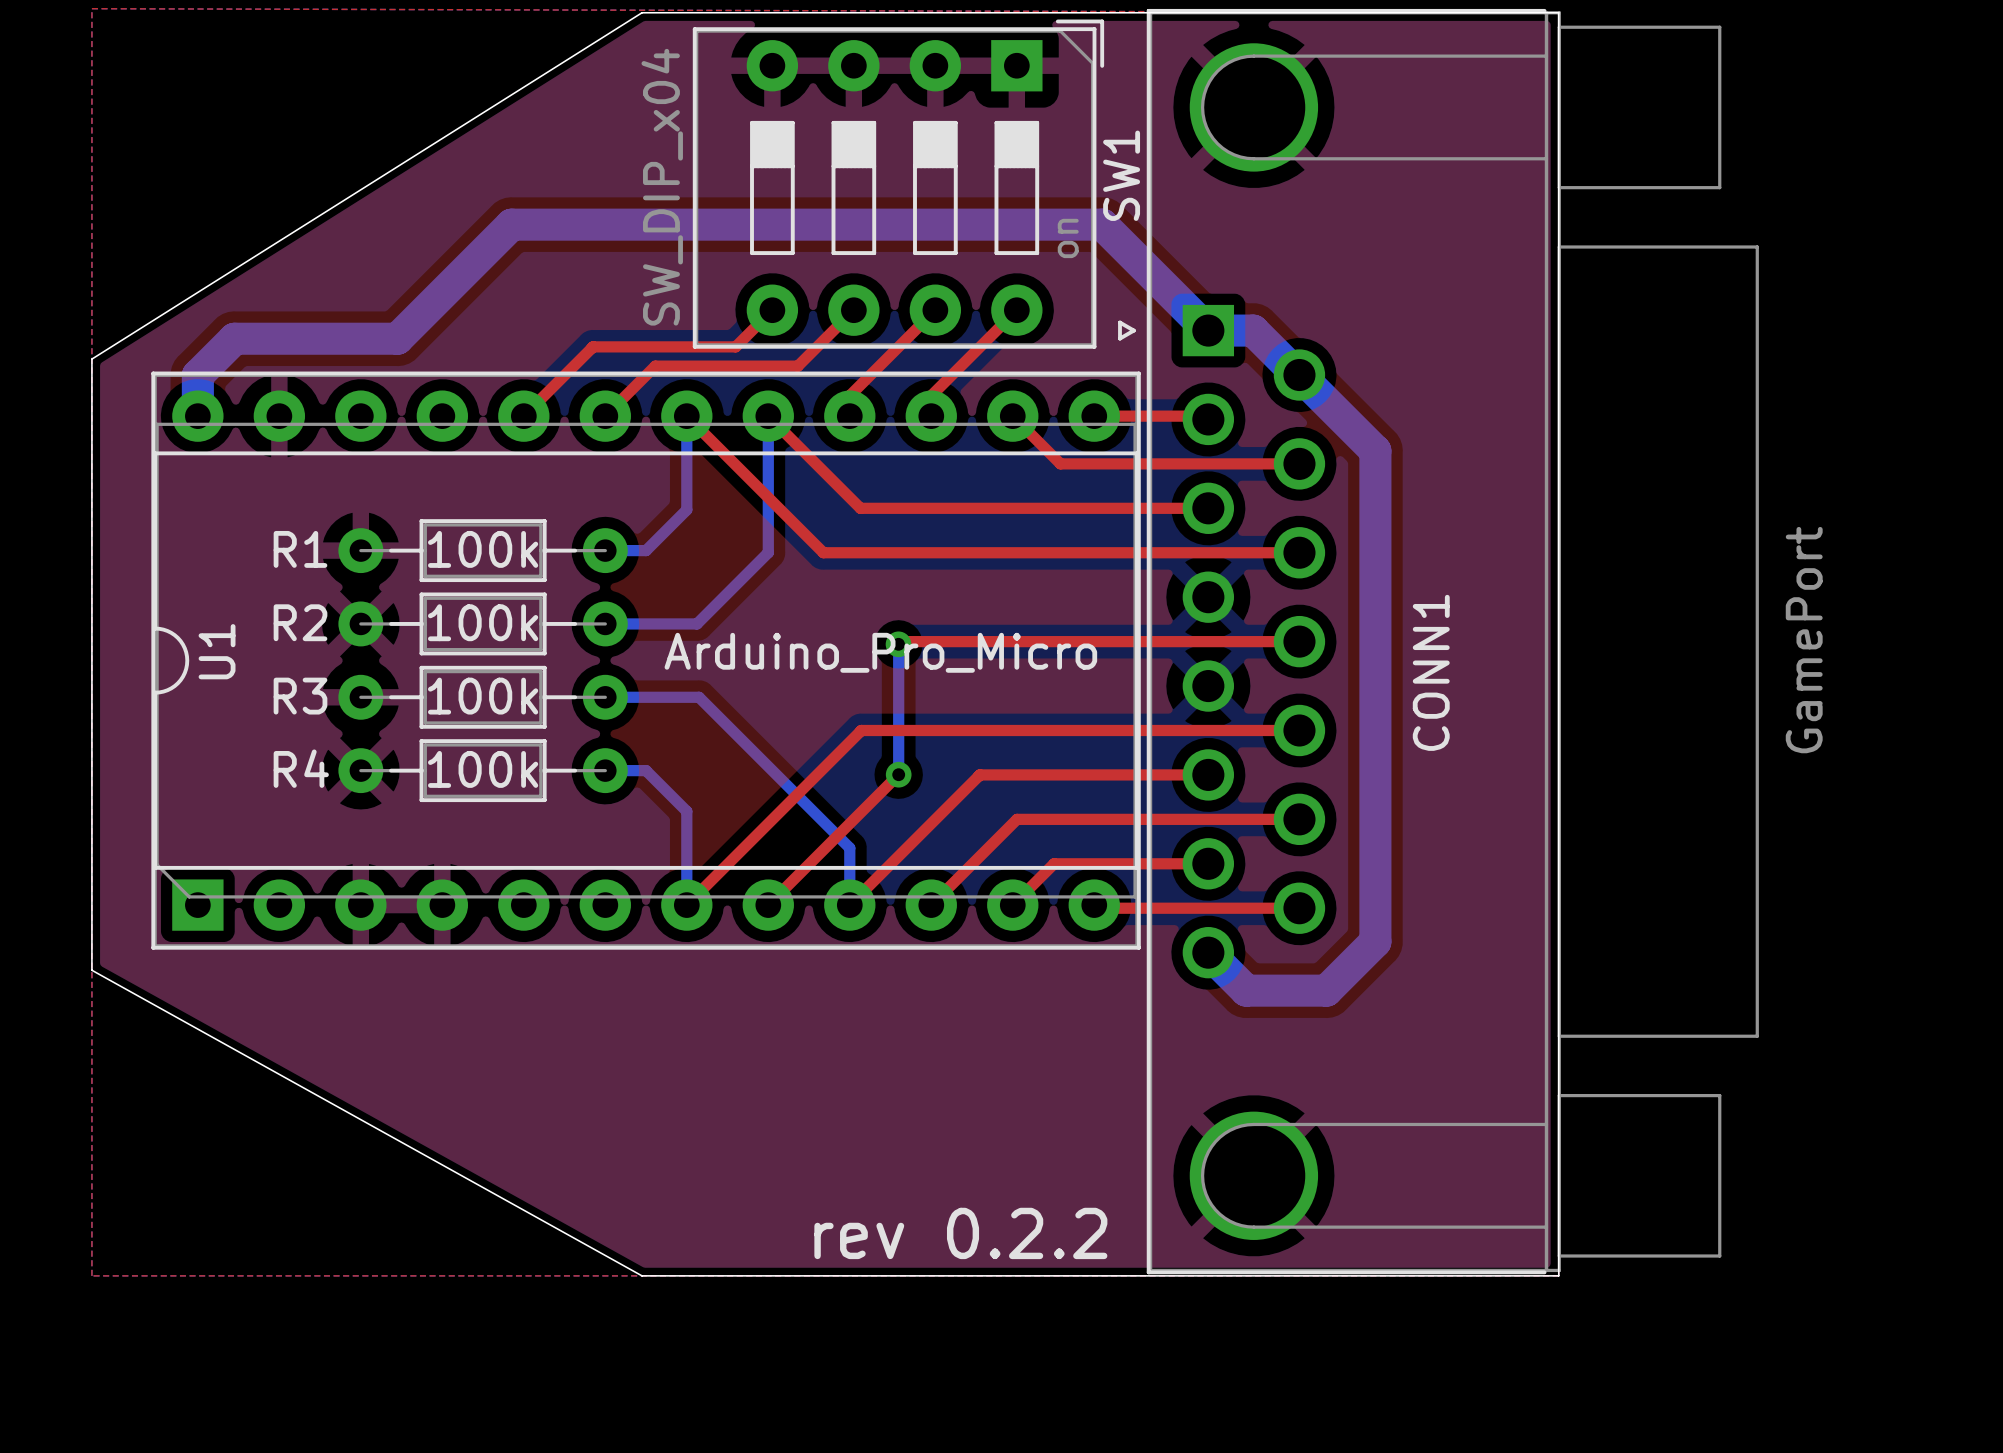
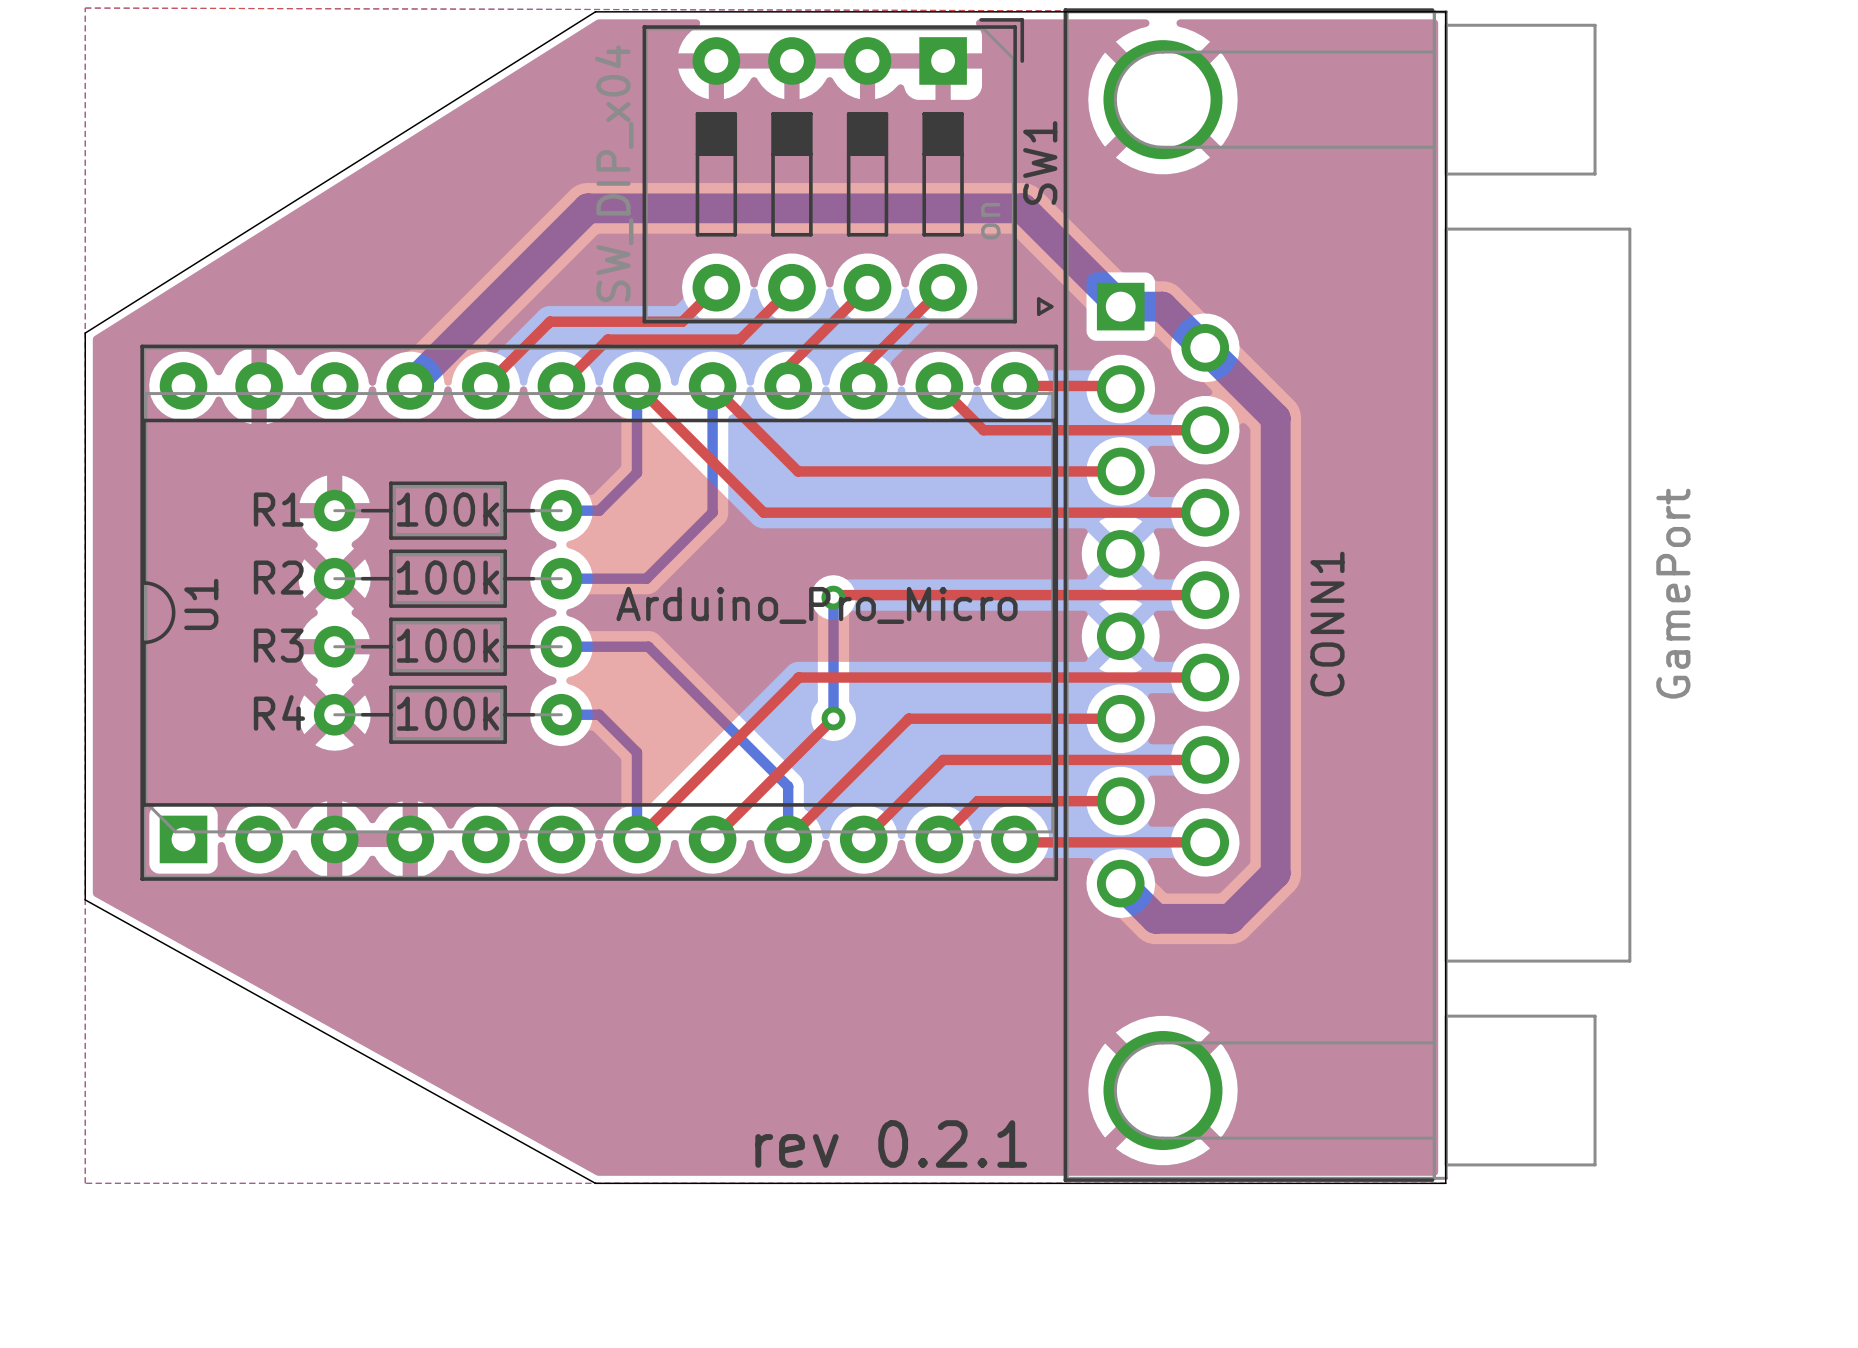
bottom track: (633, 224) (511, 224) (397, 338) (234, 338) (197, 375) (197, 416) -> (587, 208) (410, 385)
text: rev 0.2.2 (960, 1233) -> rev 0.2.1 (891, 1144)

